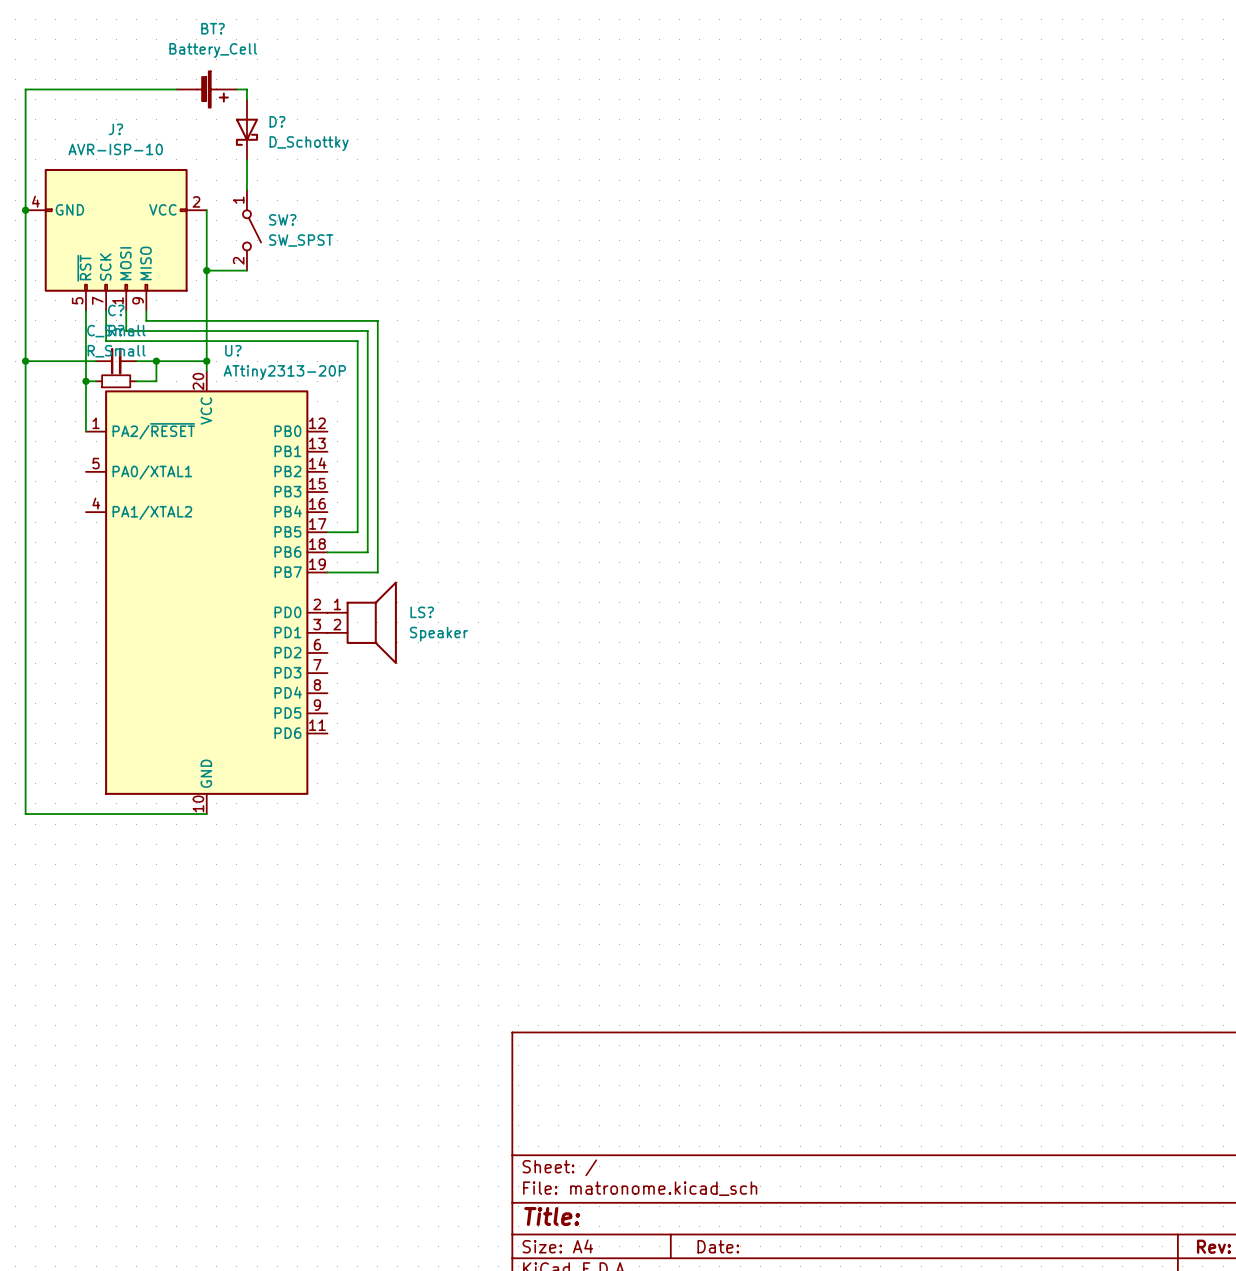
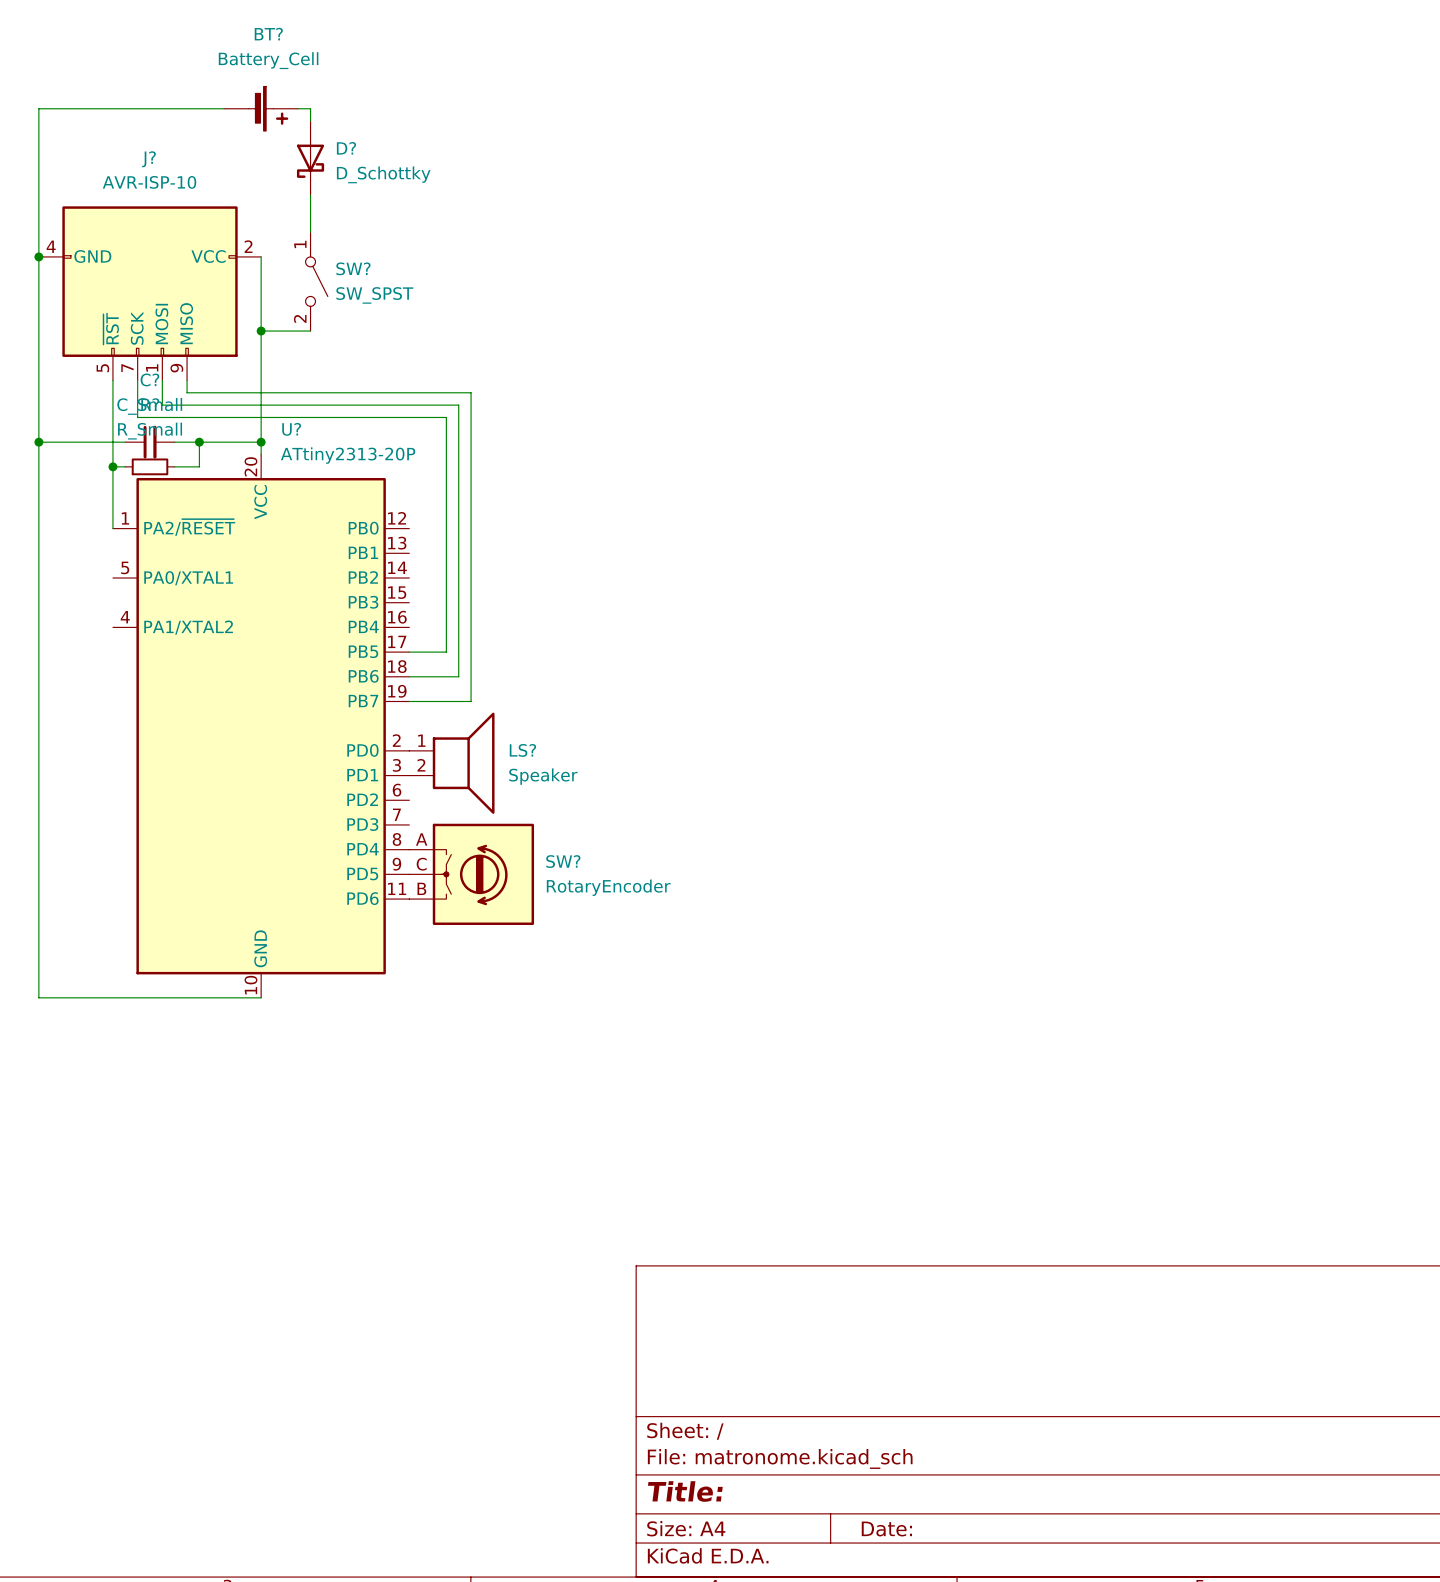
SW?: none -> RotaryEncoder (471, 874)

